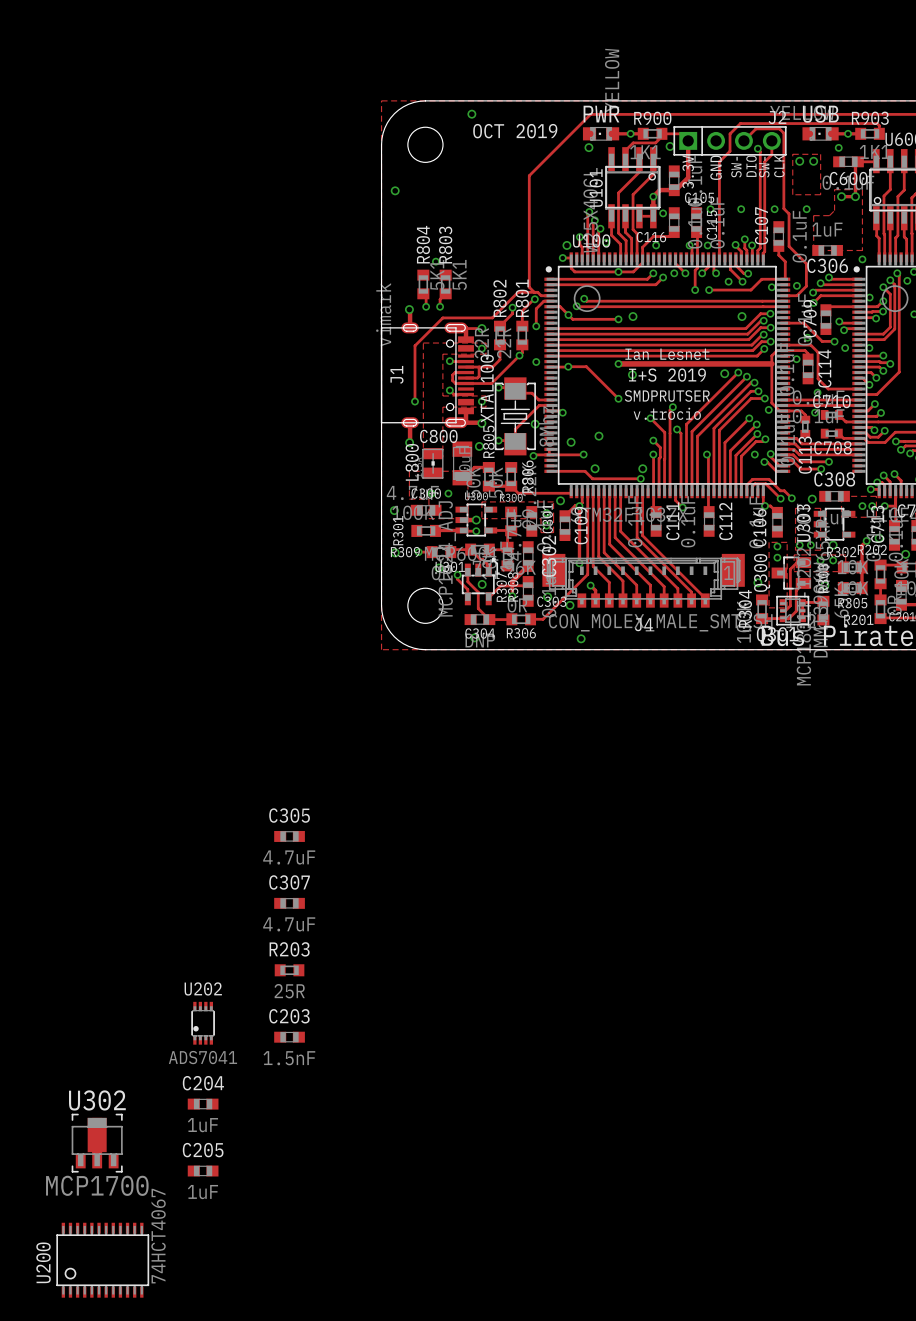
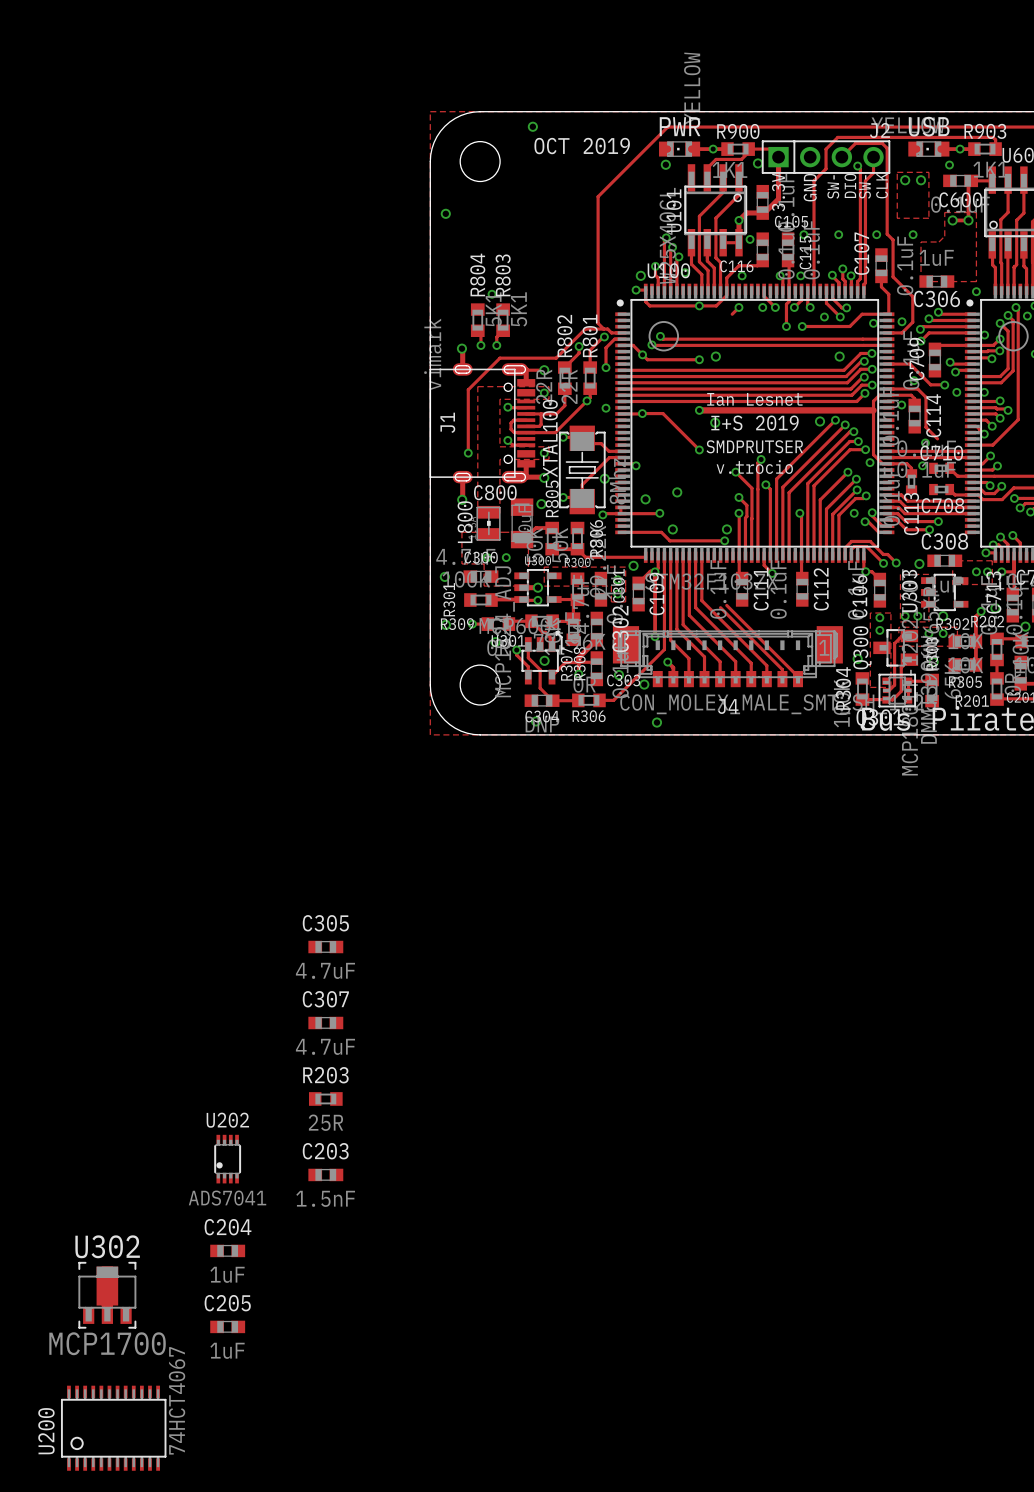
track: (663, 277) (655, 284) (549, 284) -> none
via: (663, 277) -> none
track: (549, 279) (647, 279) -> none
track: (828, 389) (857, 389) -> none
track: (637, 493) (637, 537) -> none
track: (642, 493) (642, 535) -> none

